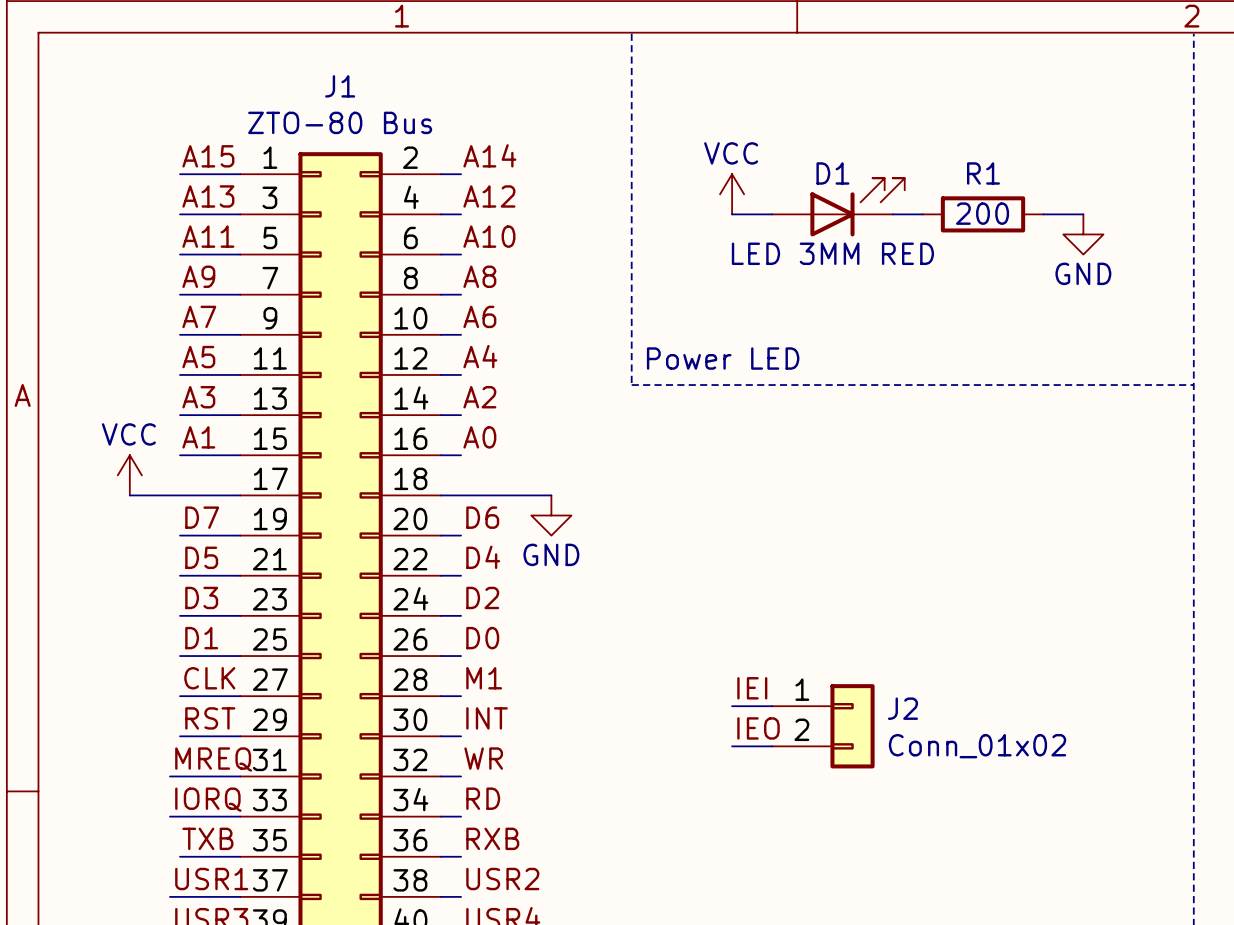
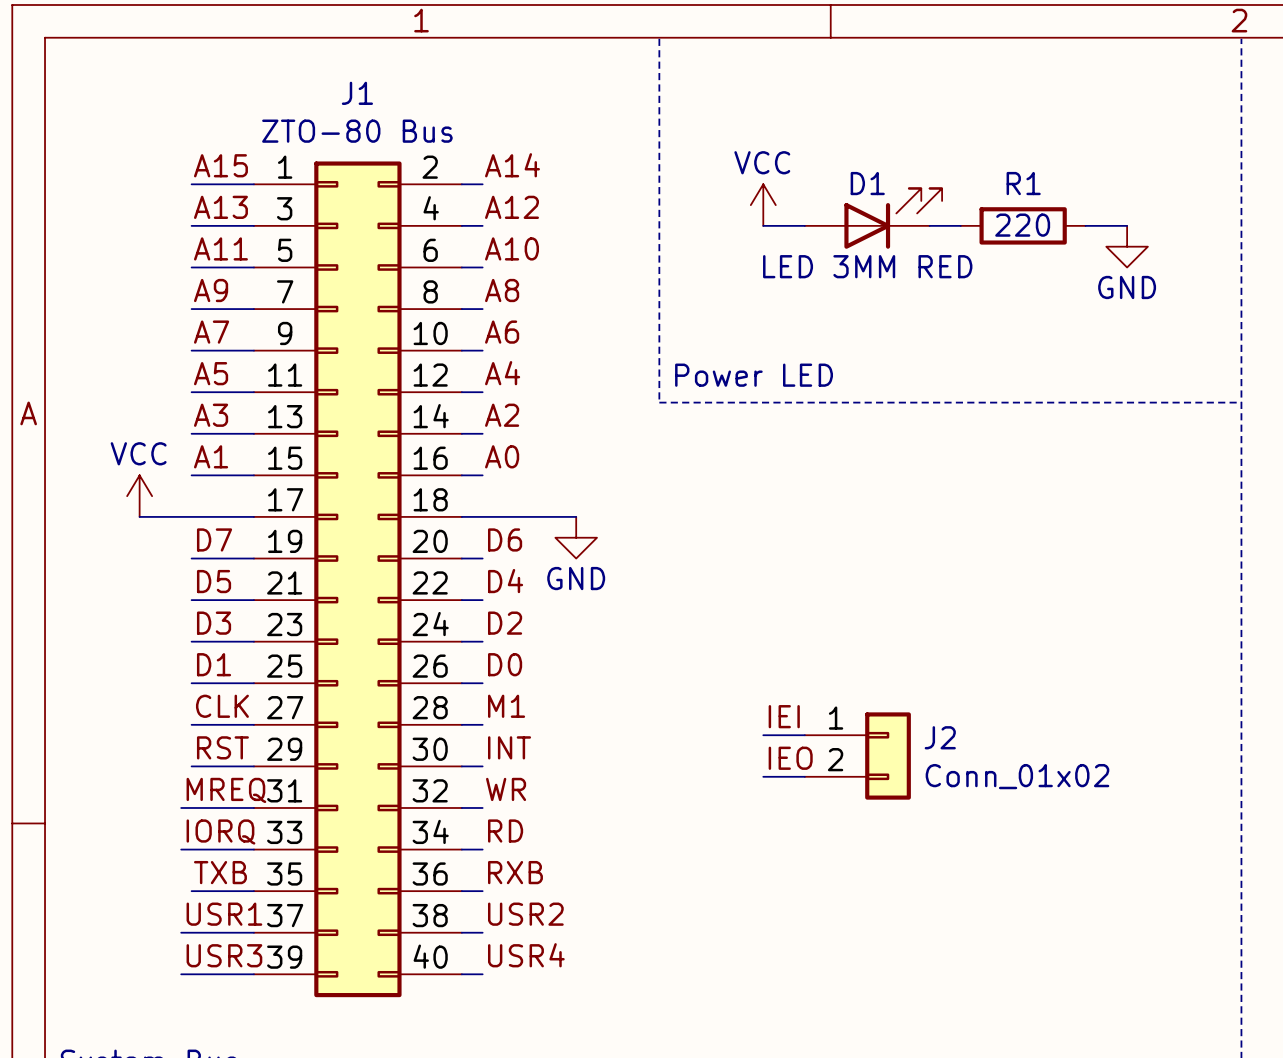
R1 value: 200 (982, 213) -> 220 (1022, 225)

